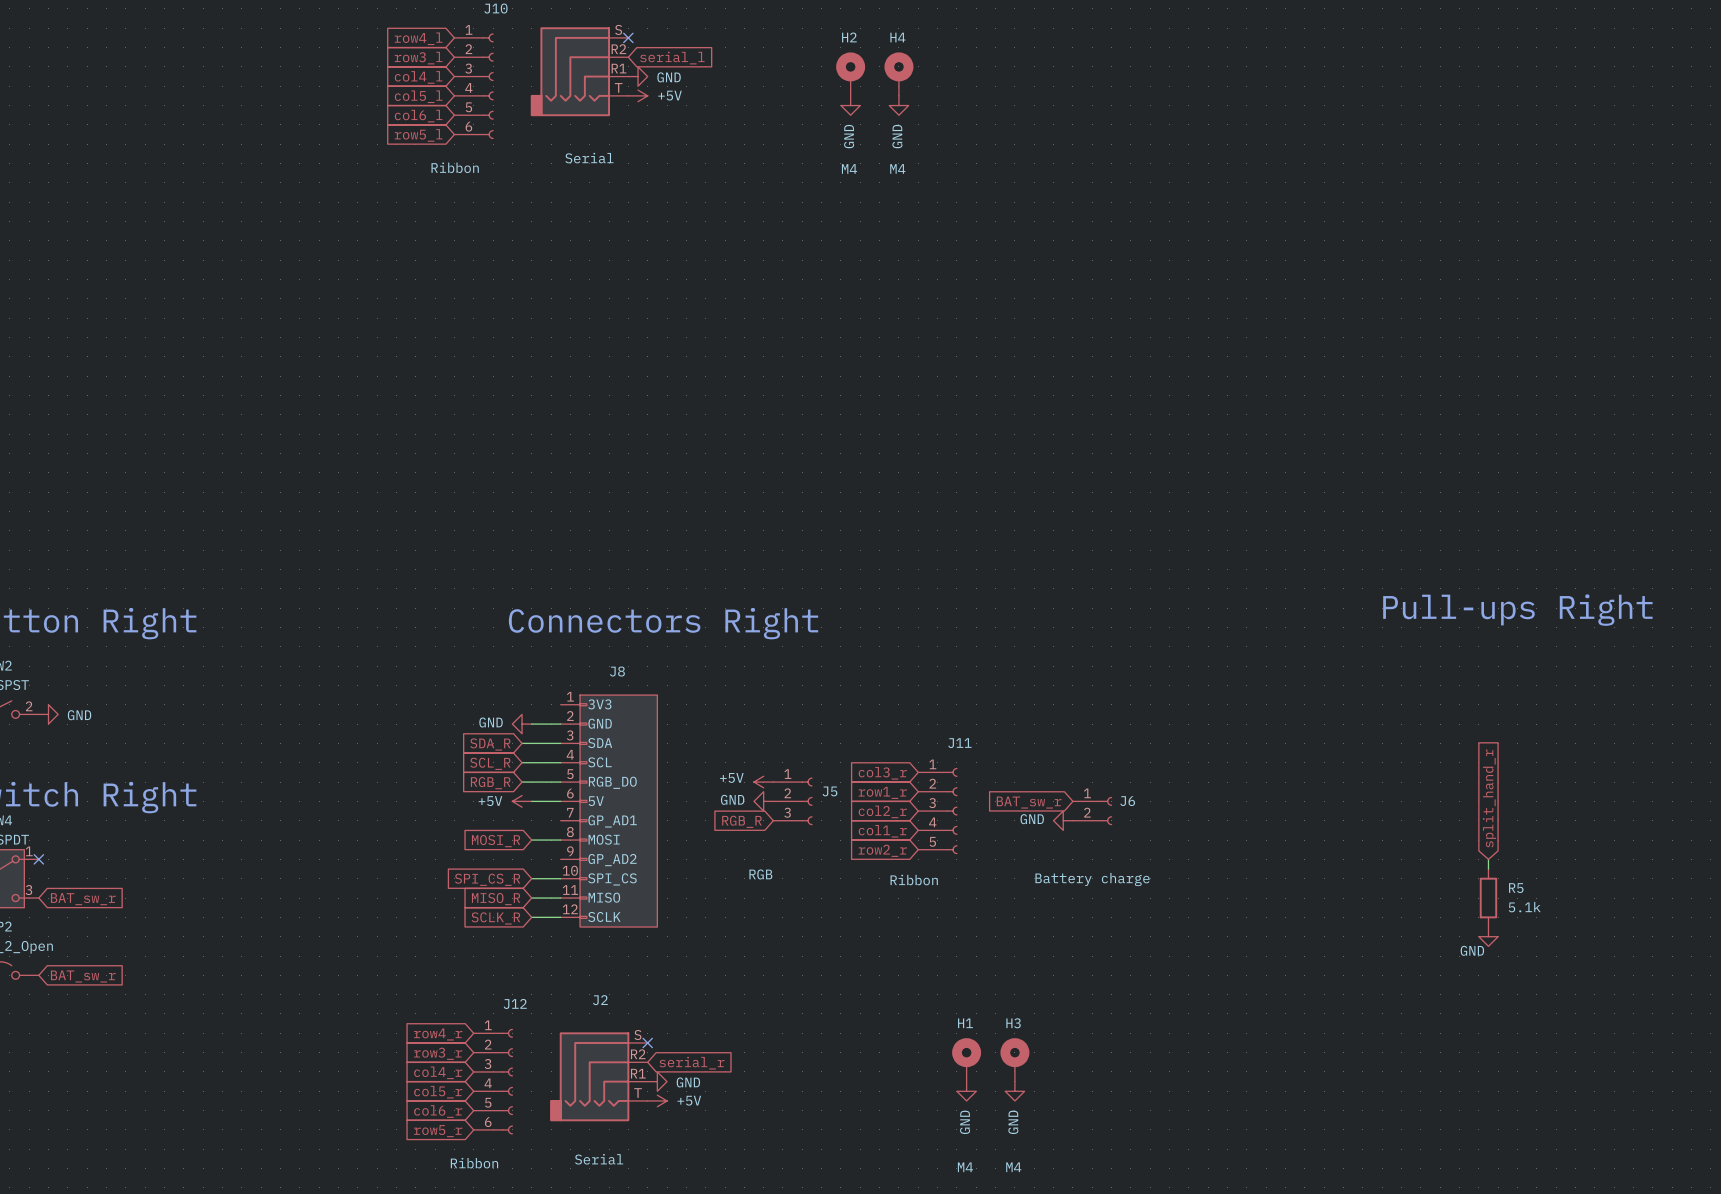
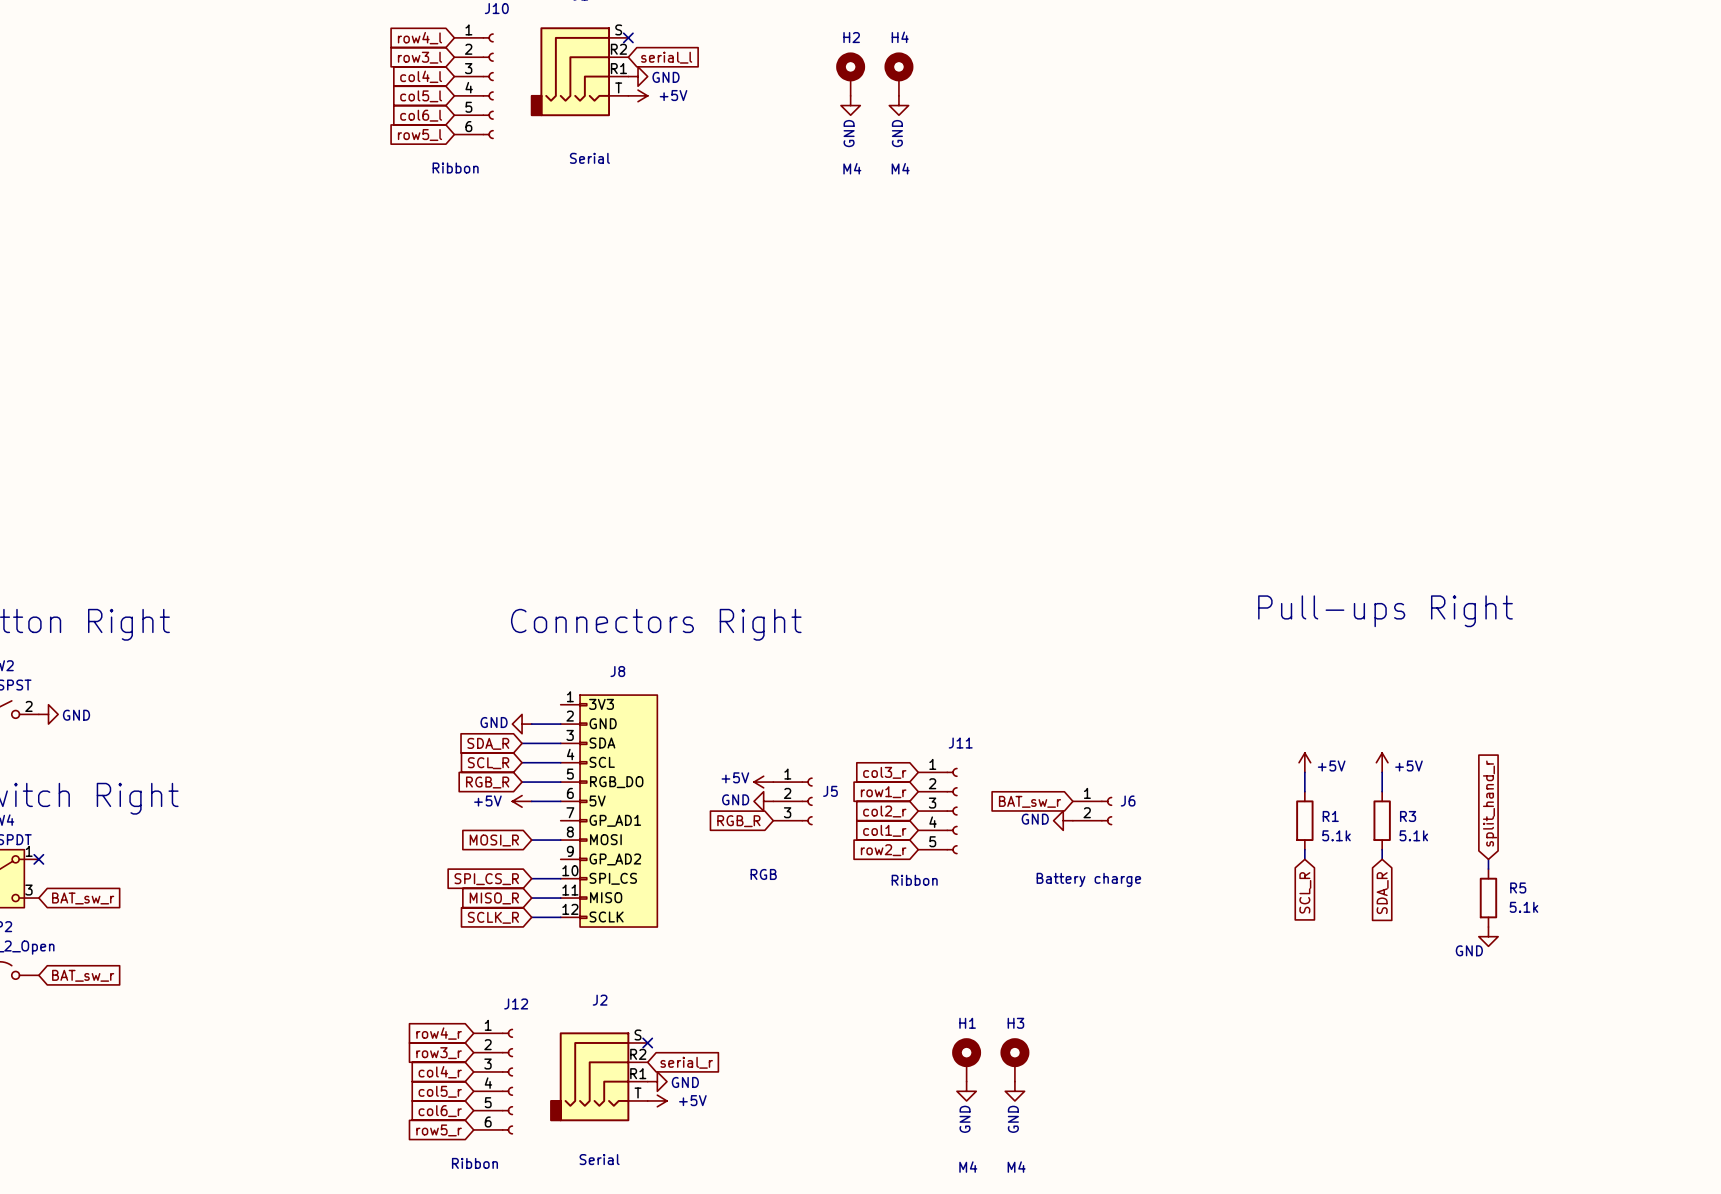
text position: Pull-ups Right (1517, 610) -> Pull-ups Right (1385, 611)
power symbol: none -> +5V (1304, 762)
power symbol: none -> +5V (1382, 762)
wire: none -> (1304, 772) (1304, 791)
wire: none -> (1382, 772) (1382, 791)
R1: none -> 5.1k (1304, 820)
R3: none -> 5.1k (1382, 820)
wire: none -> (1304, 849) (1304, 859)
wire: none -> (1382, 849) (1382, 859)
global label: none -> SCL_R (1305, 892)
global label: none -> SDA_R (1382, 893)

